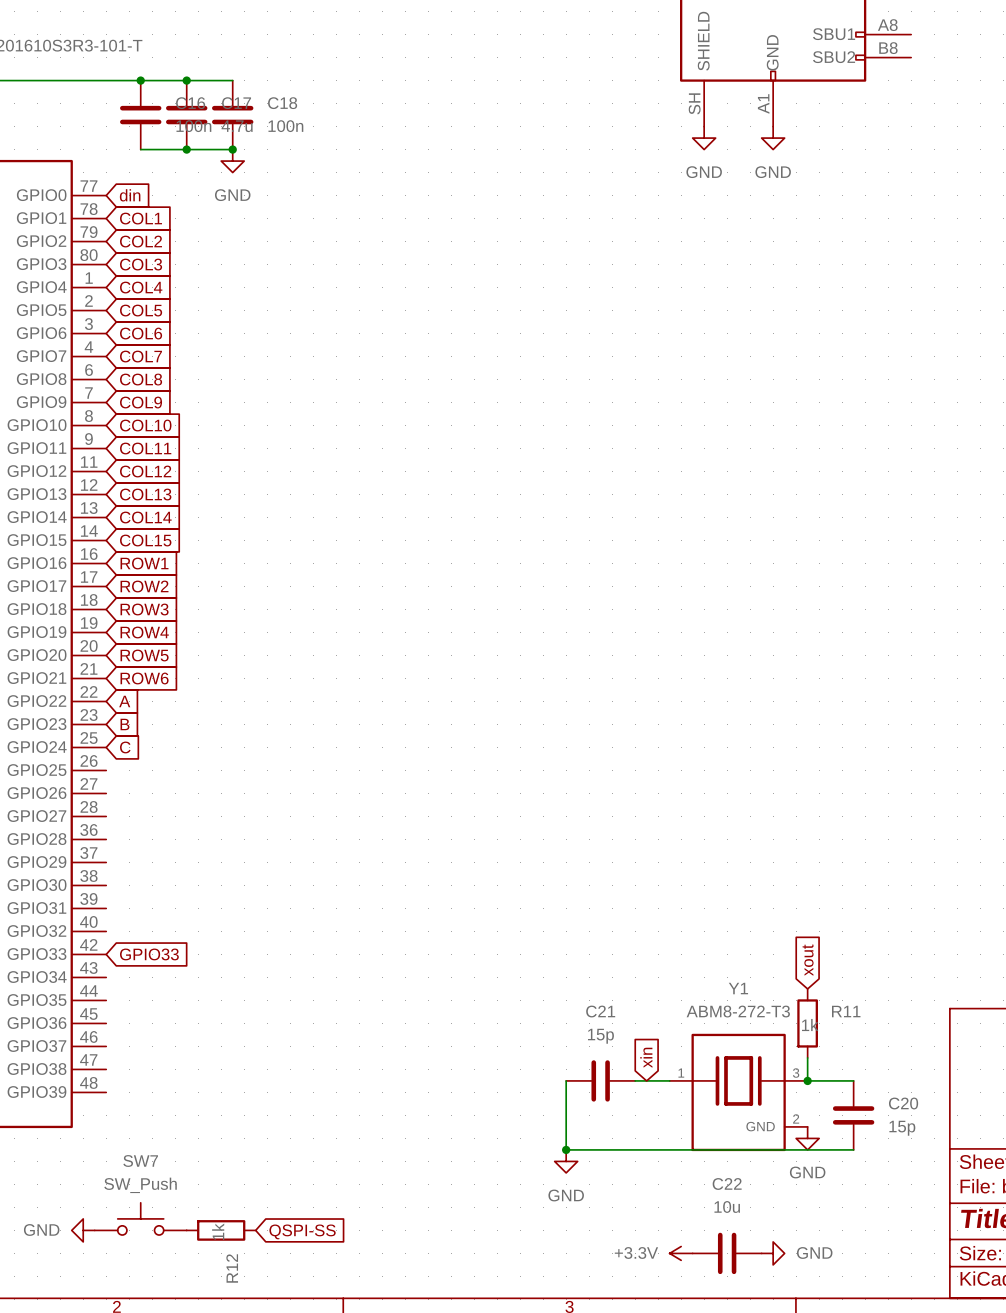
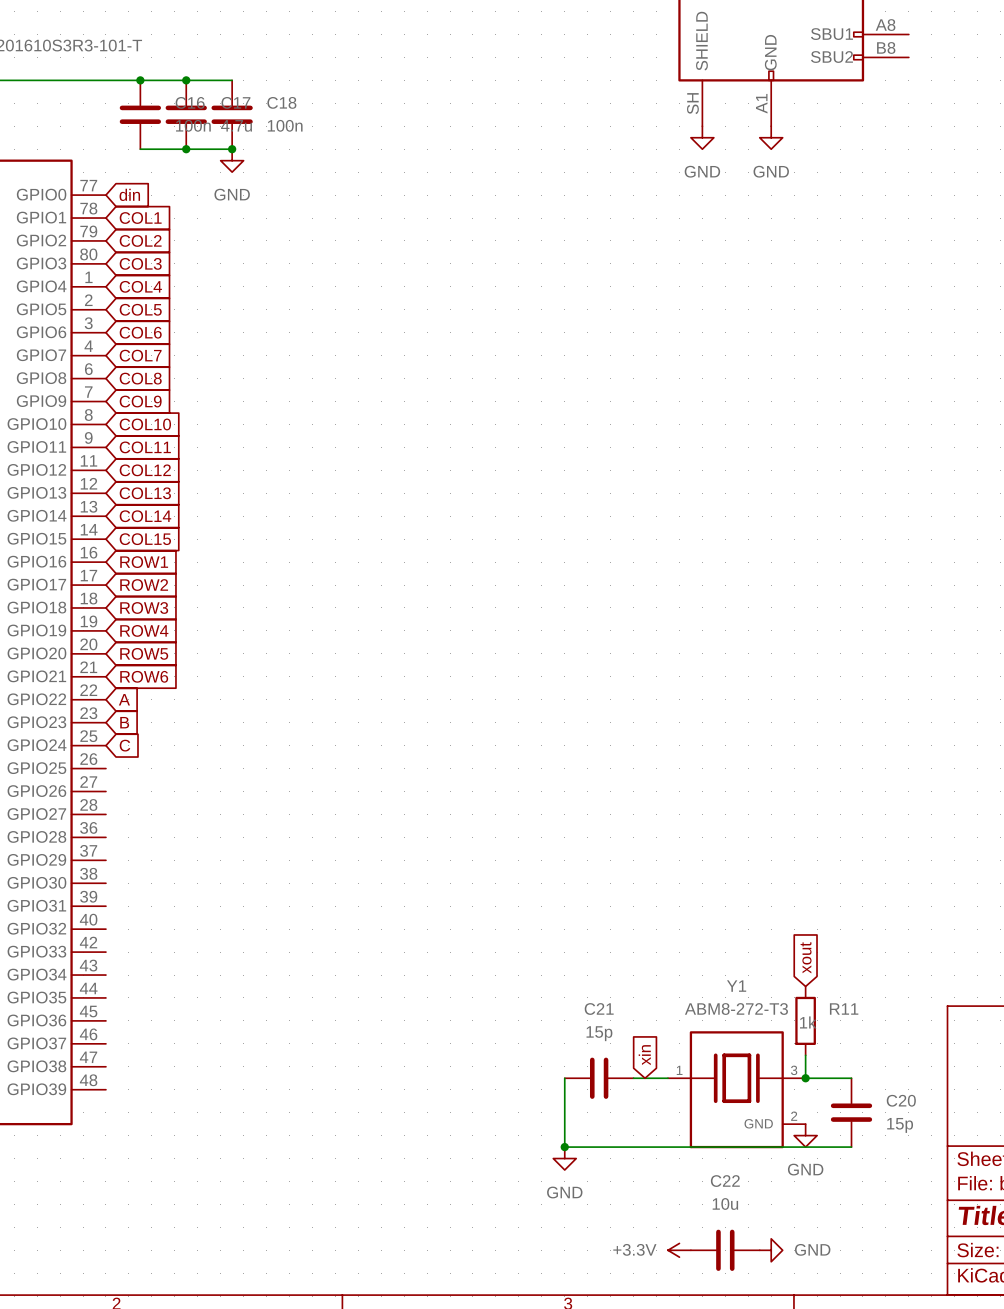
global label: GPIO33 (149, 954) -> none
SW7: SW_Push (140, 1218) -> none
power symbol: GND (83, 1230) -> none
R12: 1k (221, 1230) -> none
global label: QSPI-SS (302, 1231) -> none

